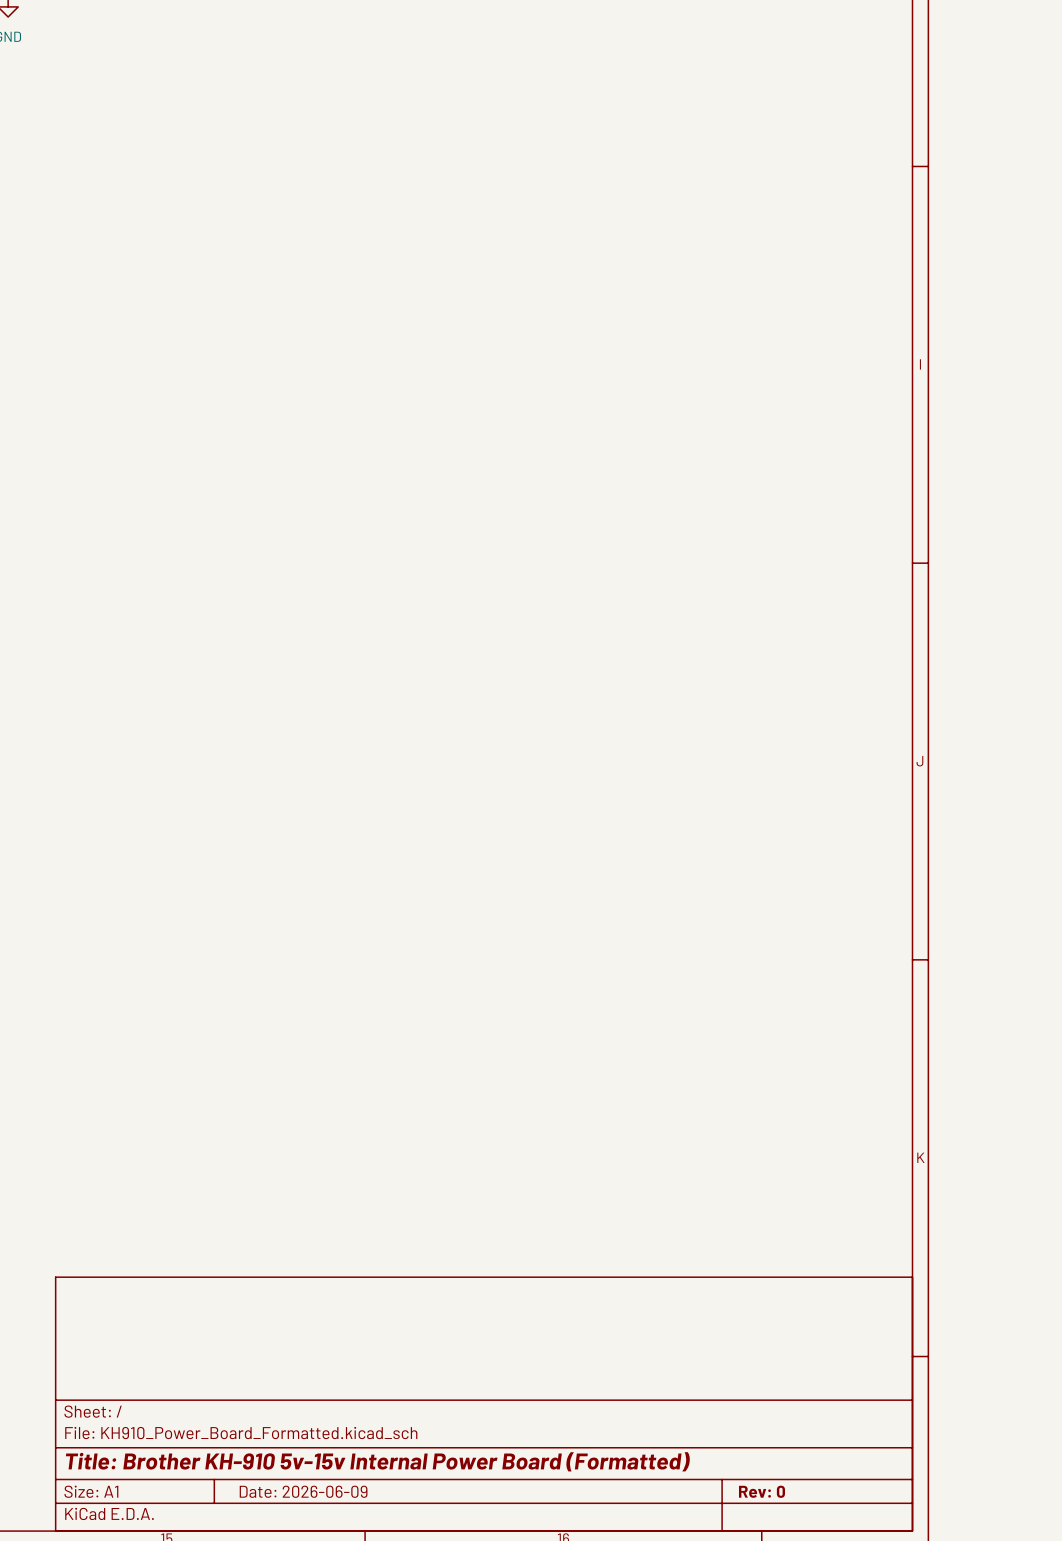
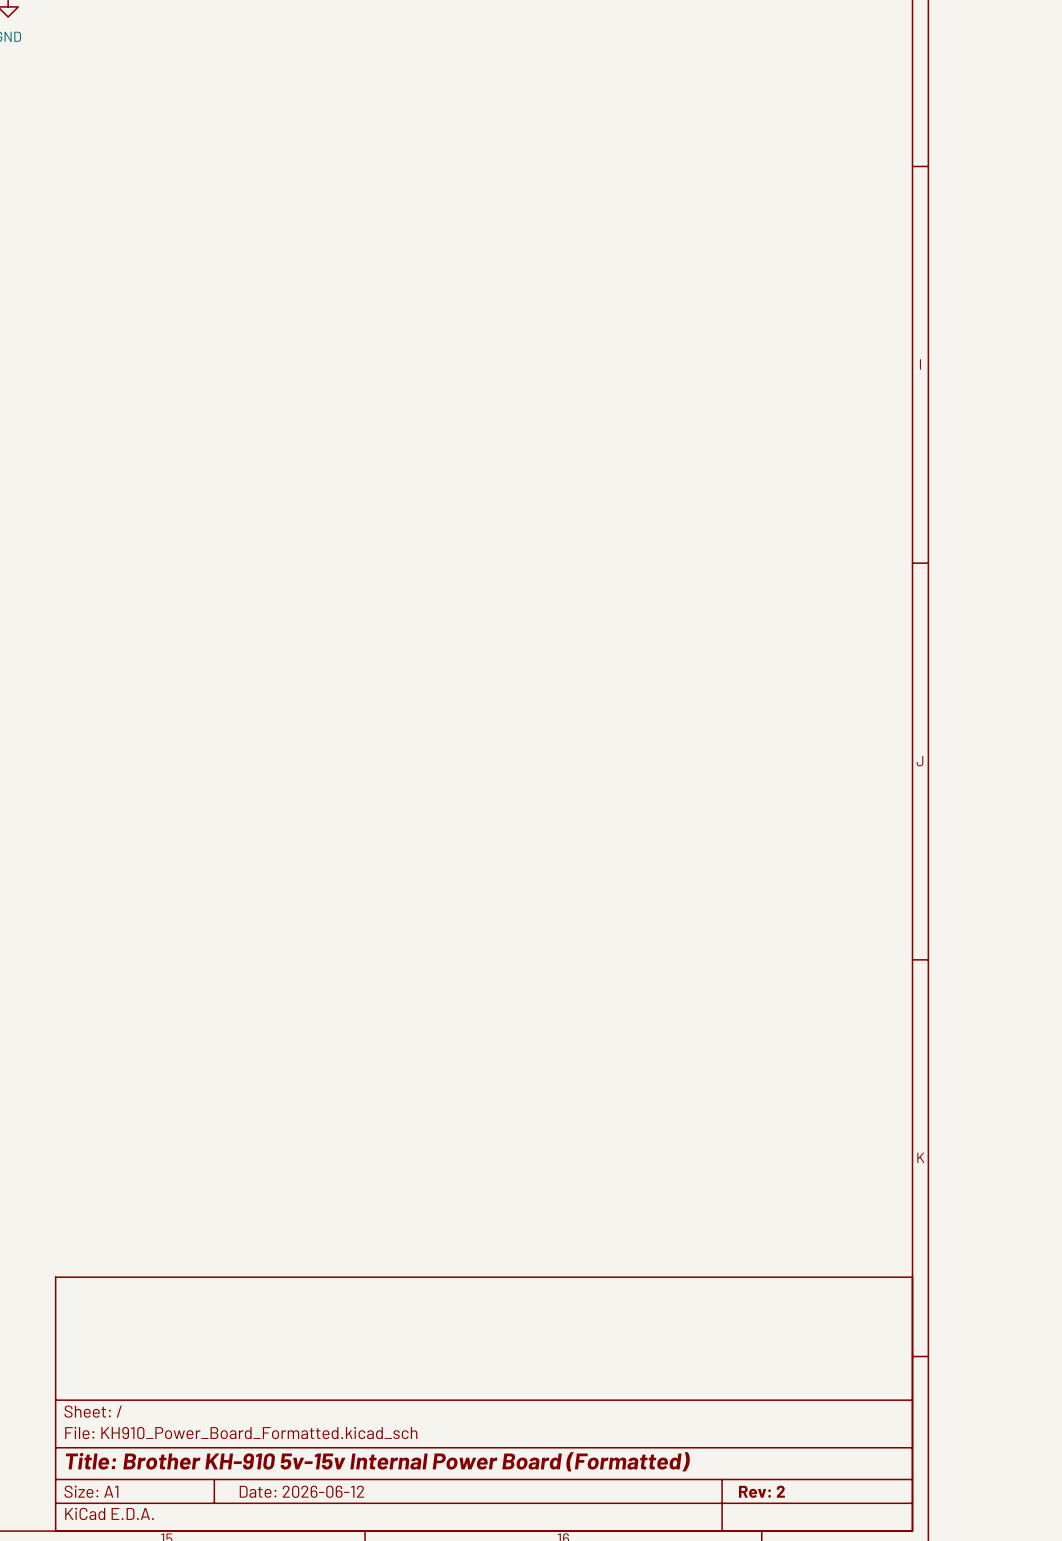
title block: Date: 2026-06-09 (303, 1491) -> Date: 2026-06-12 (301, 1491)
title block: Rev: 0 (761, 1491) -> Rev: 2 (761, 1491)

